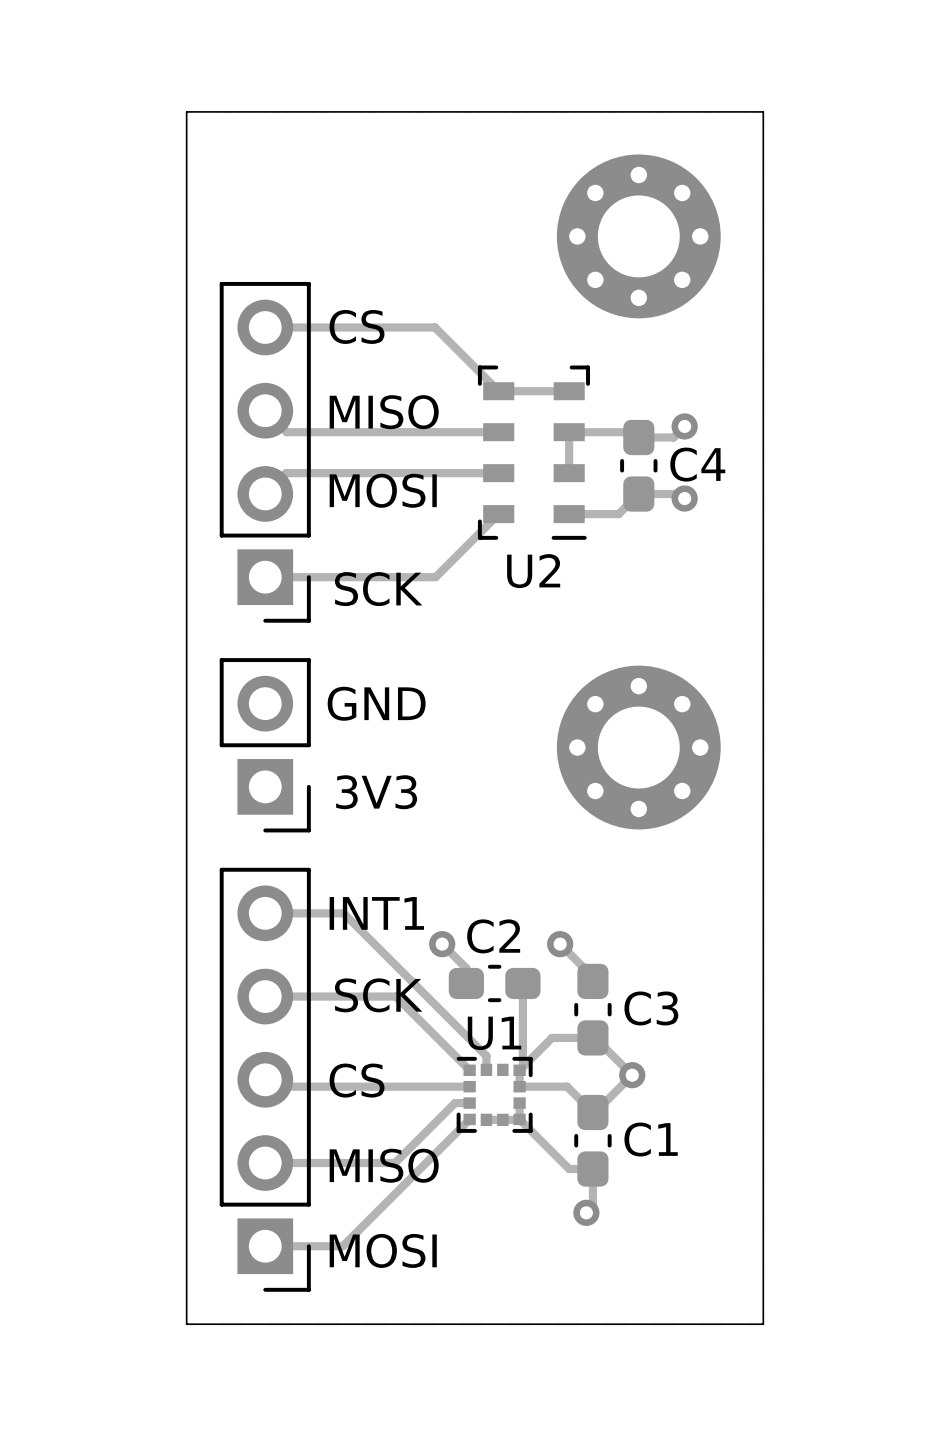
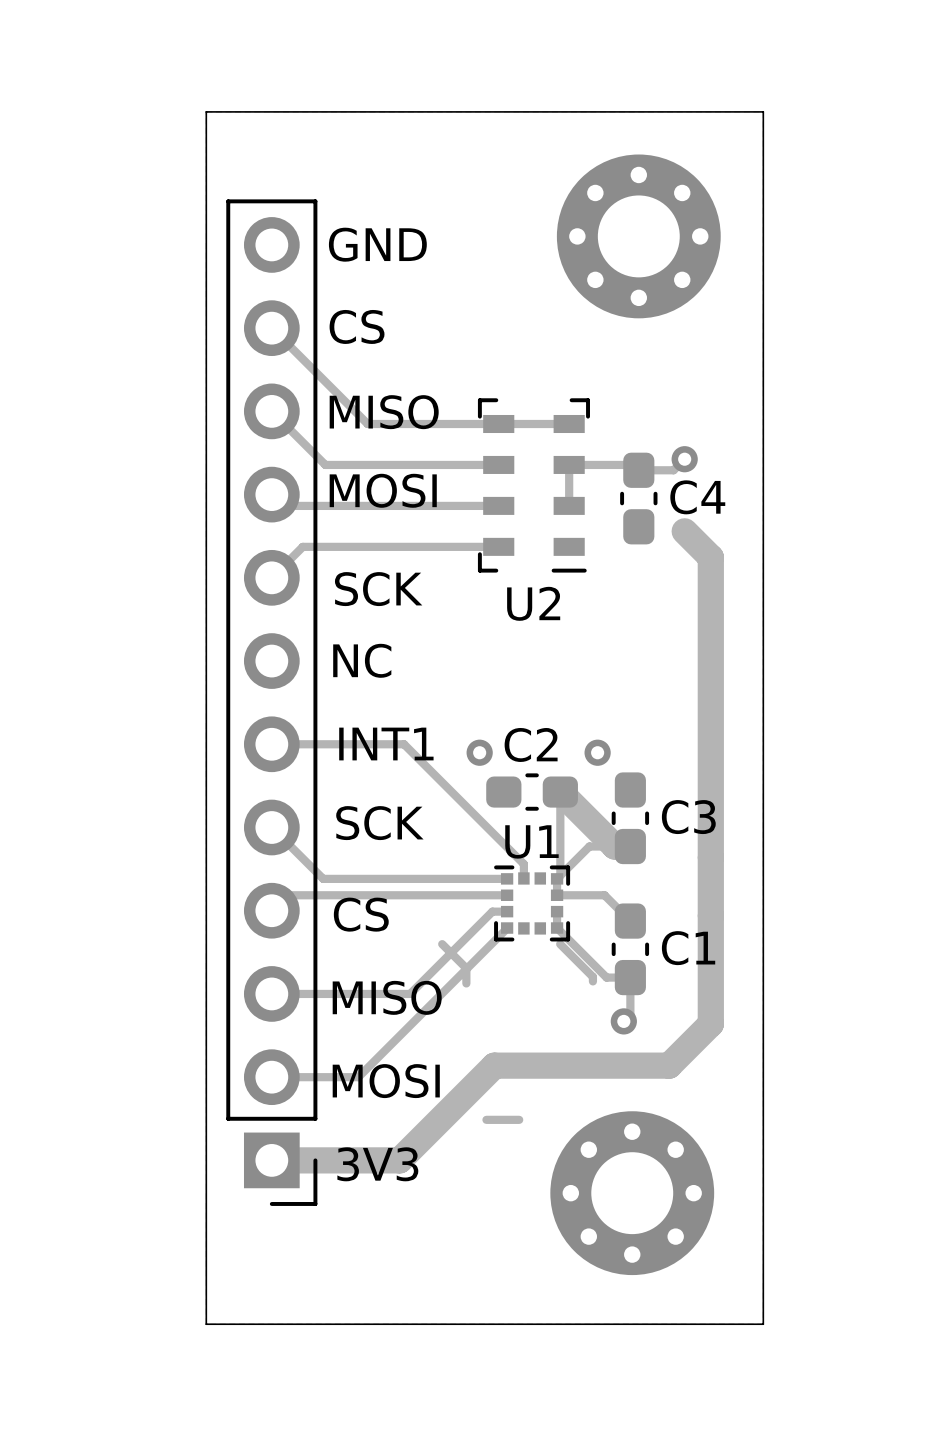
board edge: (206, 111) (186, 111) (186, 1324) (206, 1324) -> (206, 111) (206, 1324)
track: (265, 327) (435, 327) (498, 391) (569, 391) -> none
track: none -> (271, 328) (367, 423) (569, 423)
track: (265, 410) (286, 432) (498, 432) -> none
track: none -> (271, 411) (325, 464) (498, 464)
track: (684, 426) (673, 437) (638, 437) (633, 432) (569, 432) (569, 464) -> (684, 459) (673, 470) (638, 470) (633, 464) (569, 464)
via: (684, 426) -> none
part: (265, 452) -> none
U2 position: (533, 452) -> (533, 485)
via: none -> (684, 459)
C4 position: (638, 465) -> (638, 498)
track: (498, 473) (286, 473) (265, 493) -> none
track: none -> (569, 473) (569, 505)
track: none -> (271, 494) (283, 505) (498, 505)
track: (684, 498) (680, 494) (638, 494) (618, 514) (569, 514) -> none
via: (684, 498) -> none
track: (498, 514) (435, 577) (265, 577) -> none
track: none -> (680, 526) (710, 557) (710, 1024) (669, 1065) (494, 1065) (399, 1160) (271, 1160)
track: none -> (498, 546) (302, 546) (271, 577)
text: none -> NC (362, 660)
part: none -> (271, 702)
text position: GND (376, 703) -> GND (377, 244)
track: none -> (271, 744) (404, 744) (523, 864) (523, 878)
part: (265, 745) -> none
part position: (638, 747) -> (632, 1193)
via: none -> (479, 752)
via: none -> (597, 752)
text position: 3V3 (376, 792) -> 3V3 (377, 1164)
track: none -> (271, 827) (323, 878) (507, 878)
track: none -> (560, 875) (560, 792) (614, 846) (630, 846) (589, 846) (557, 878) (557, 895) (604, 895) (630, 921)
track: none -> (507, 895) (287, 895) (271, 910)
track: none -> (507, 911) (492, 911) (410, 993) (271, 993)
track: (265, 913) (343, 913) (486, 1056) (486, 1069) -> none
text position: INT1 (376, 913) -> INT1 (386, 744)
track: none -> (507, 928) (358, 1077) (271, 1077)
via: (442, 944) -> none
via: (560, 944) -> none
C2 position: (494, 983) -> (532, 792)
track: (522, 983) (522, 1067) -> none
text position: SCK (378, 995) -> SCK (379, 823)
track: (265, 996) (395, 996) (469, 1070) -> none
C3 position: (592, 1009) -> (630, 818)
via: none -> (623, 1021)
track: (551, 1037) (519, 1070) (519, 1086) (567, 1086) (594, 1112) (632, 1075) (594, 1037) (551, 1037) -> none
via: (632, 1075) -> none
track: (265, 1079) (272, 1086) (469, 1086) -> none
part: (265, 1079) -> none
text position: CS (357, 1080) -> CS (361, 914)
U1 position: (494, 1094) -> (532, 903)
track: (469, 1103) (454, 1103) (395, 1163) (265, 1163) -> none
track: (519, 1103) (519, 1119) (569, 1169) (592, 1169) (592, 1206) (586, 1212) -> (557, 911) (557, 928) (606, 977) (630, 977) (630, 1014) (623, 1021)
track: (469, 1119) (342, 1246) (265, 1246) -> none
C1 position: (592, 1140) -> (630, 949)
text position: MISO (384, 1165) -> MISO (387, 997)
via: (586, 1212) -> none
text position: MOSI (383, 1250) -> MOSI (386, 1081)

